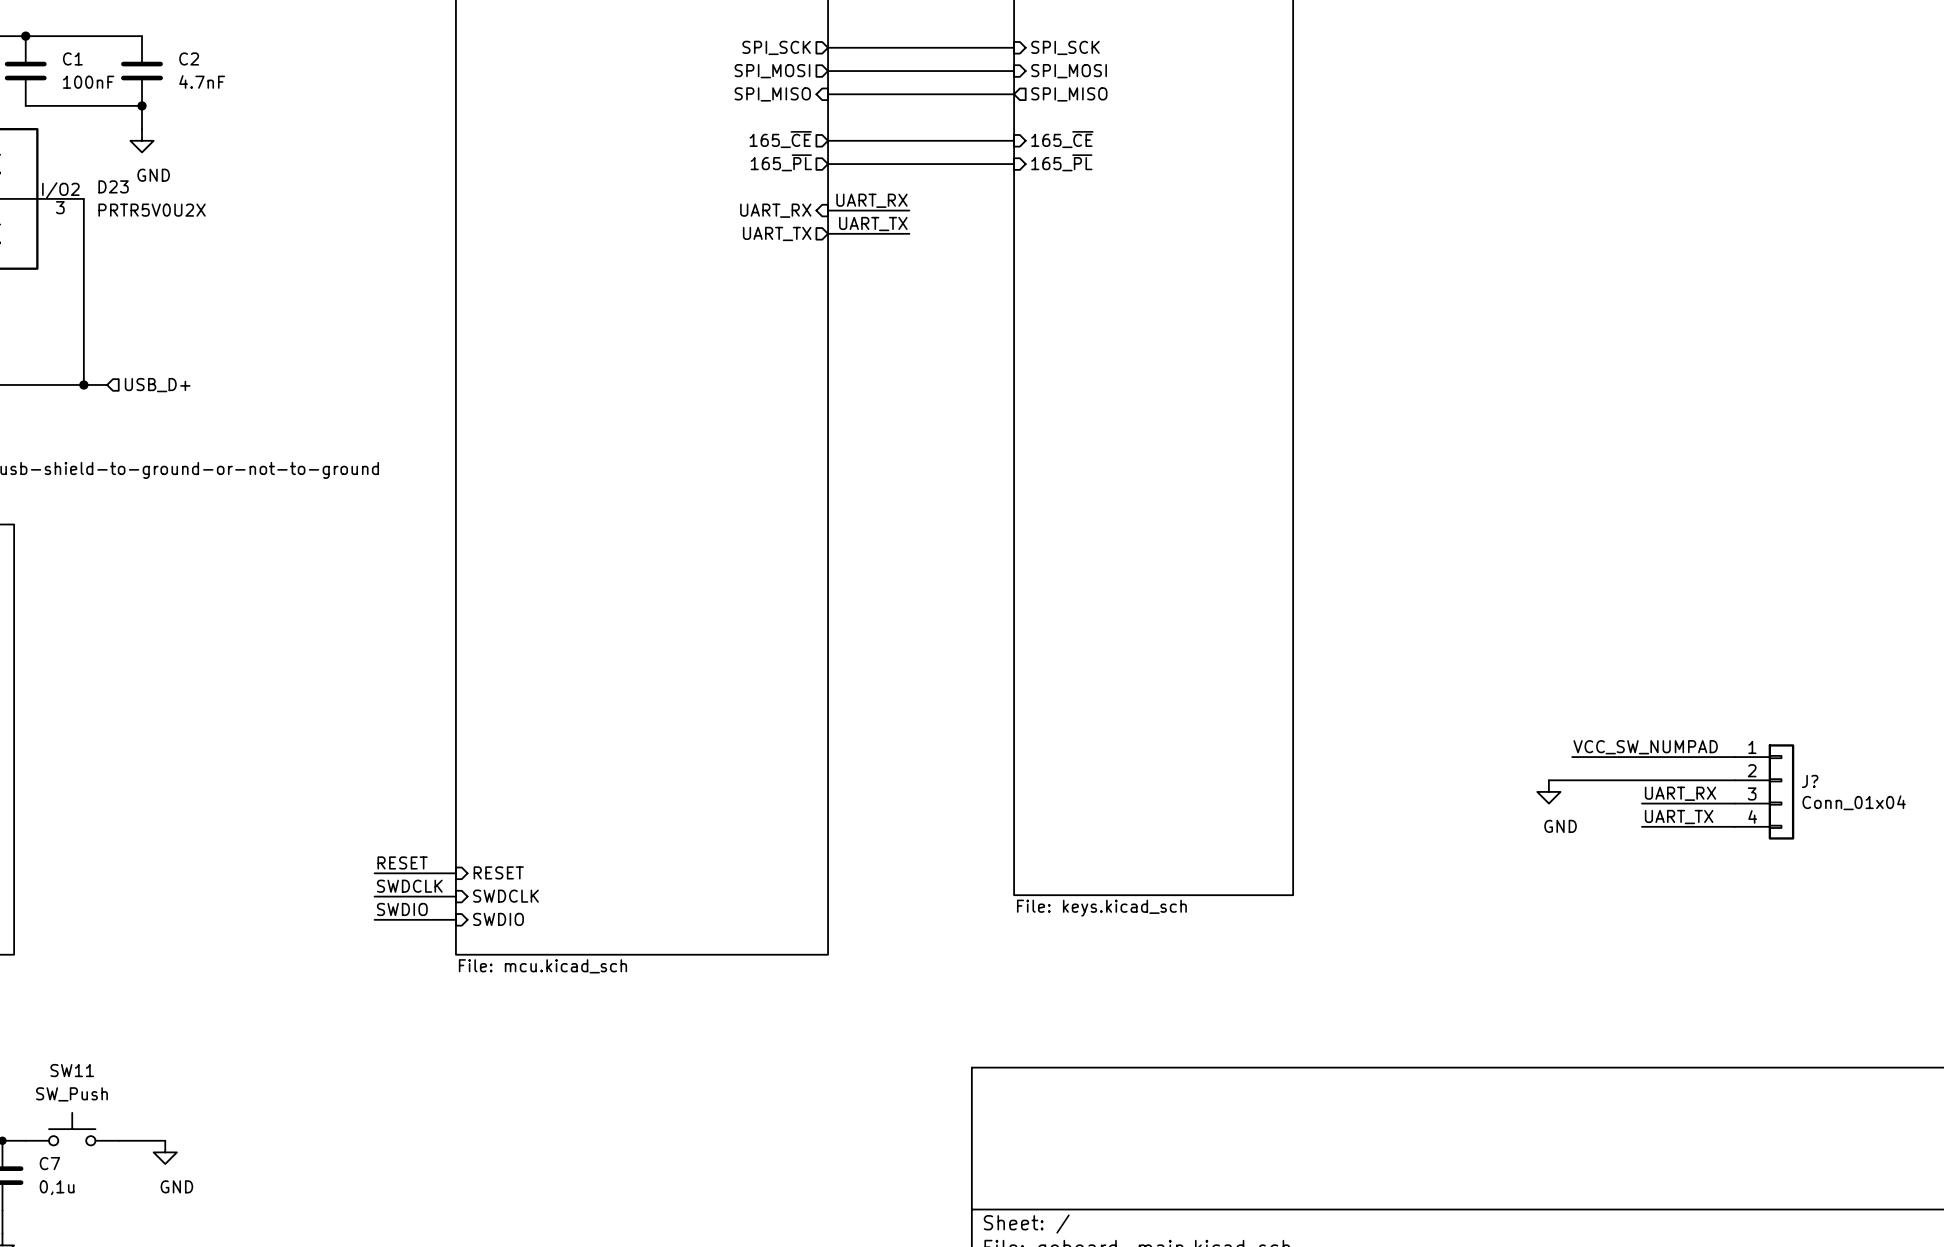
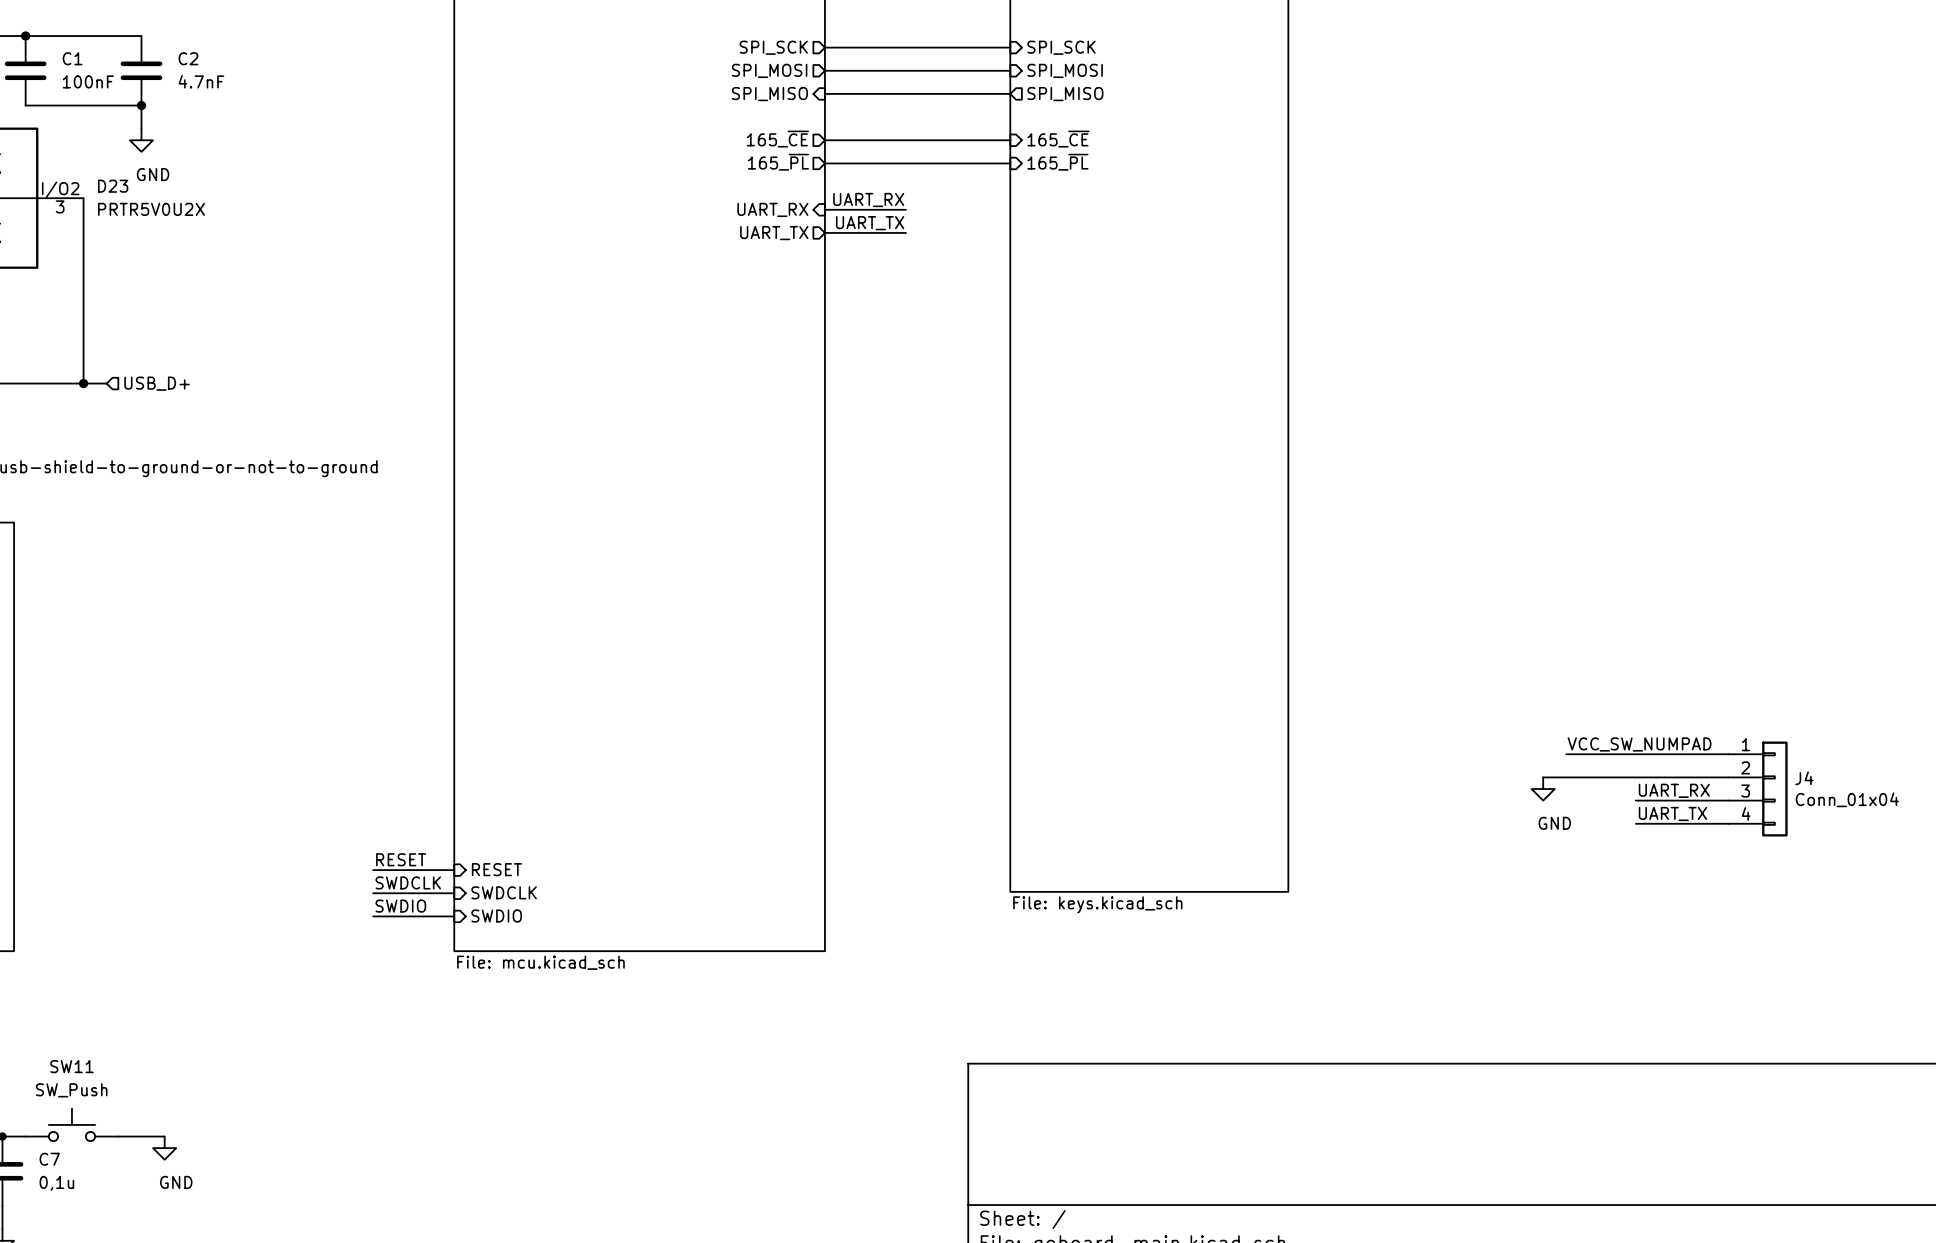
J? name: J? (1810, 781) -> J4 (1804, 778)

